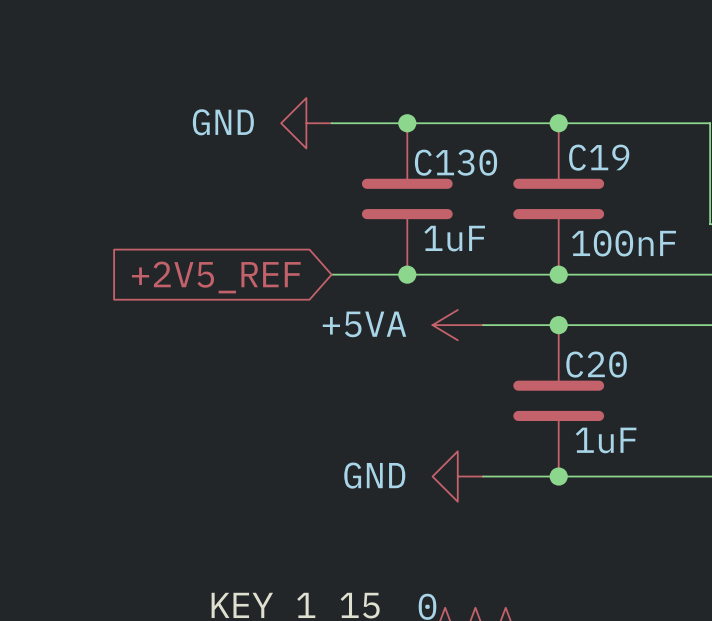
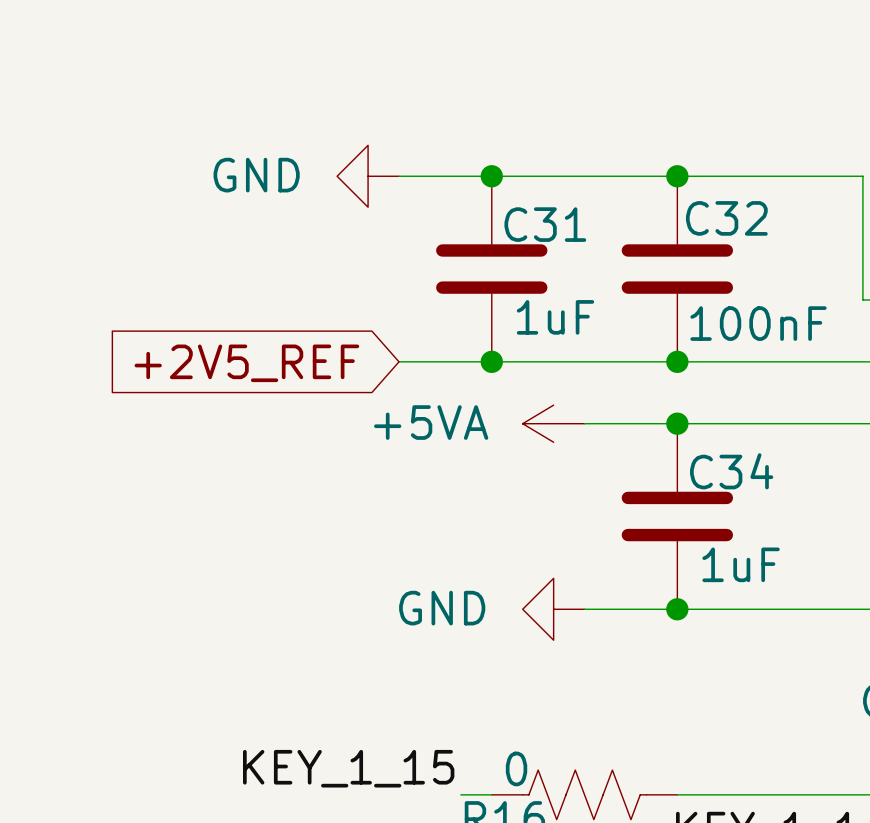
C19 name: C19 (599, 157) -> C32 (726, 218)
C130 name: C130 (455, 162) -> C31 (545, 224)
C20 name: C20 (596, 364) -> C34 (731, 471)

